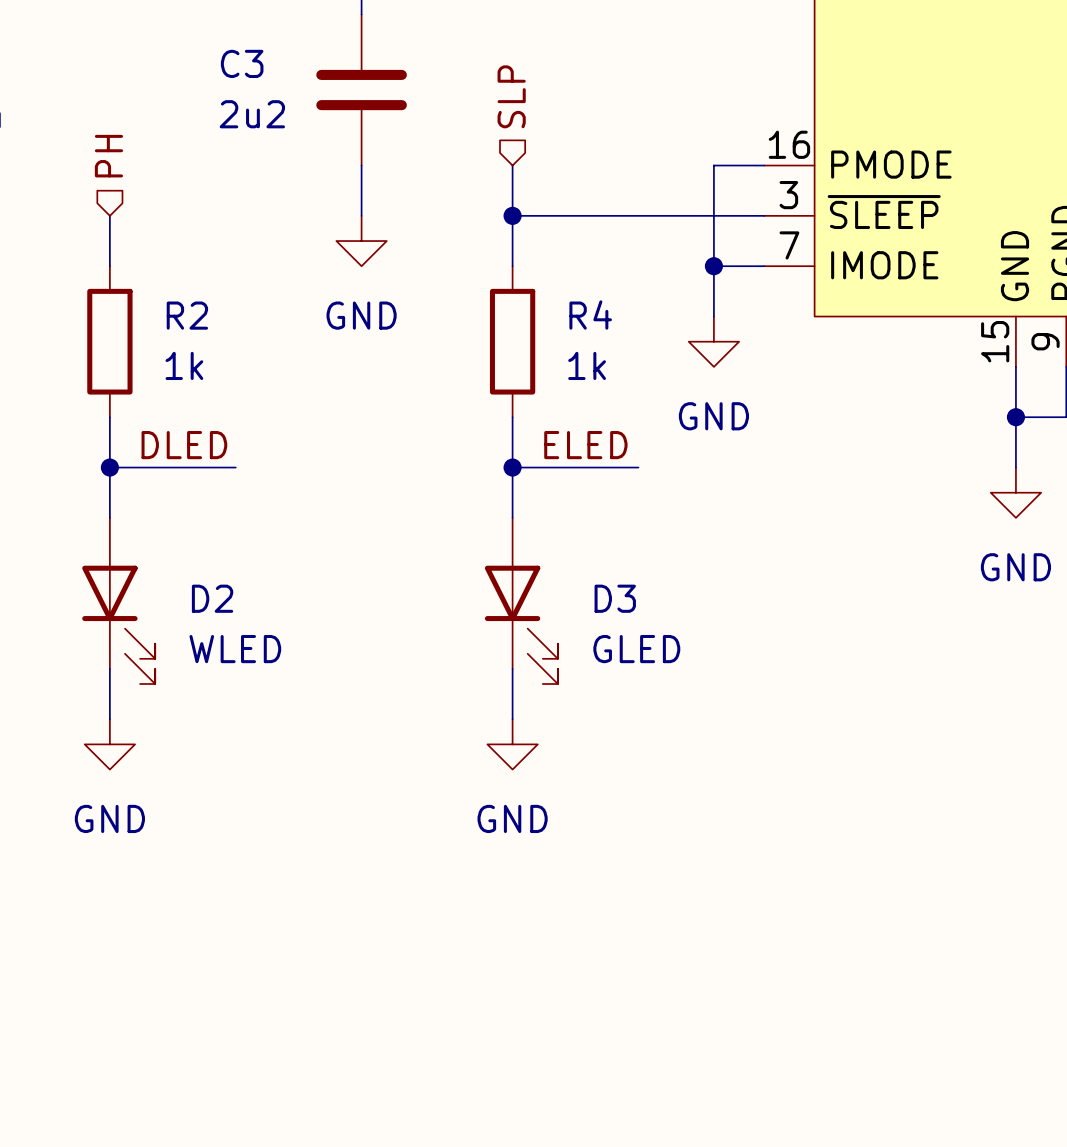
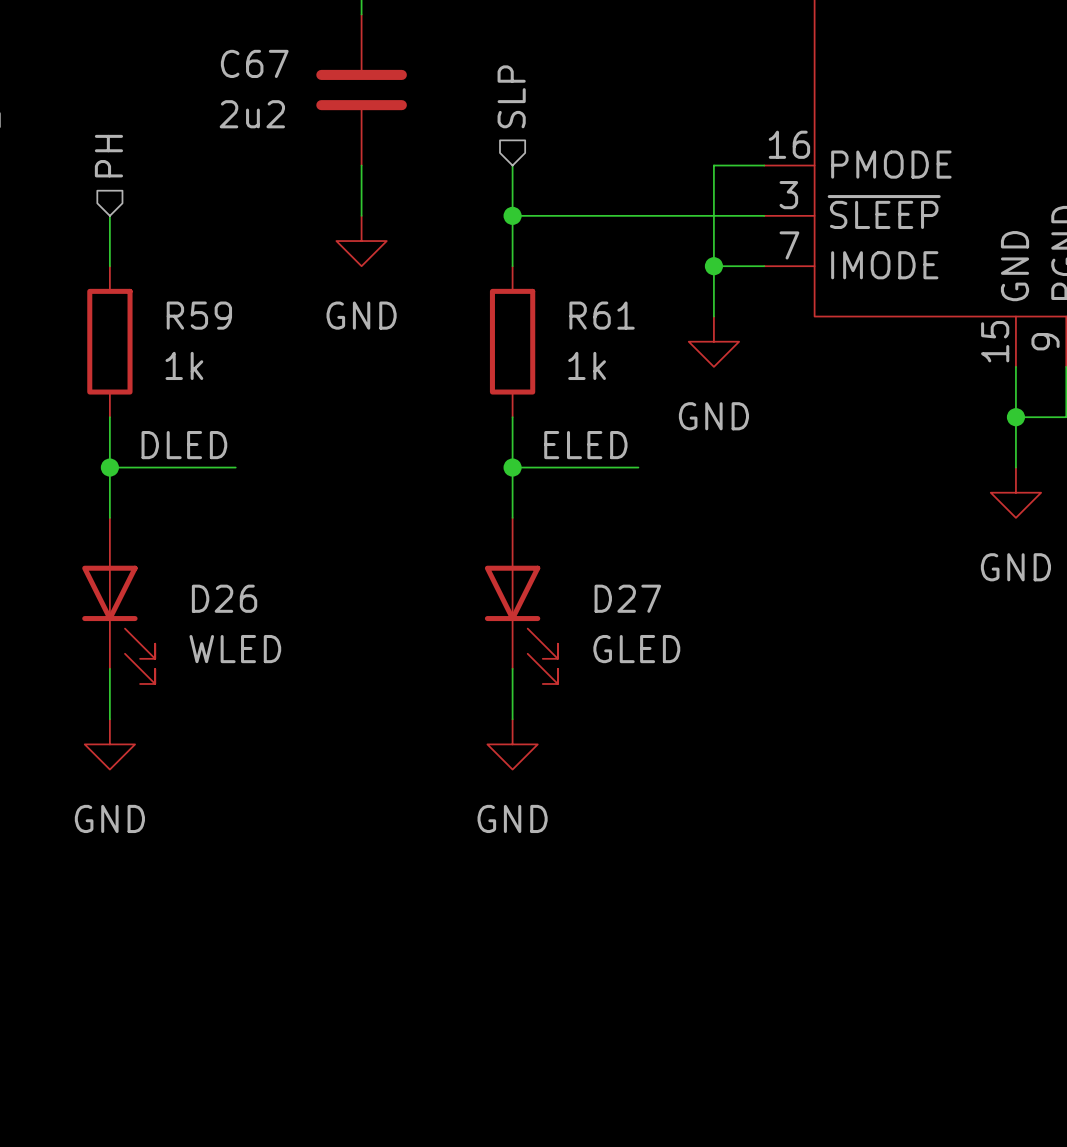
C3 name: C3 (242, 63) -> C67 (254, 63)
R4 name: R4 (590, 314) -> R61 (602, 315)
R2 name: R2 (187, 315) -> R59 (199, 315)
D2 name: D2 (212, 598) -> D26 (224, 598)
D3 name: D3 (615, 598) -> D27 (627, 598)

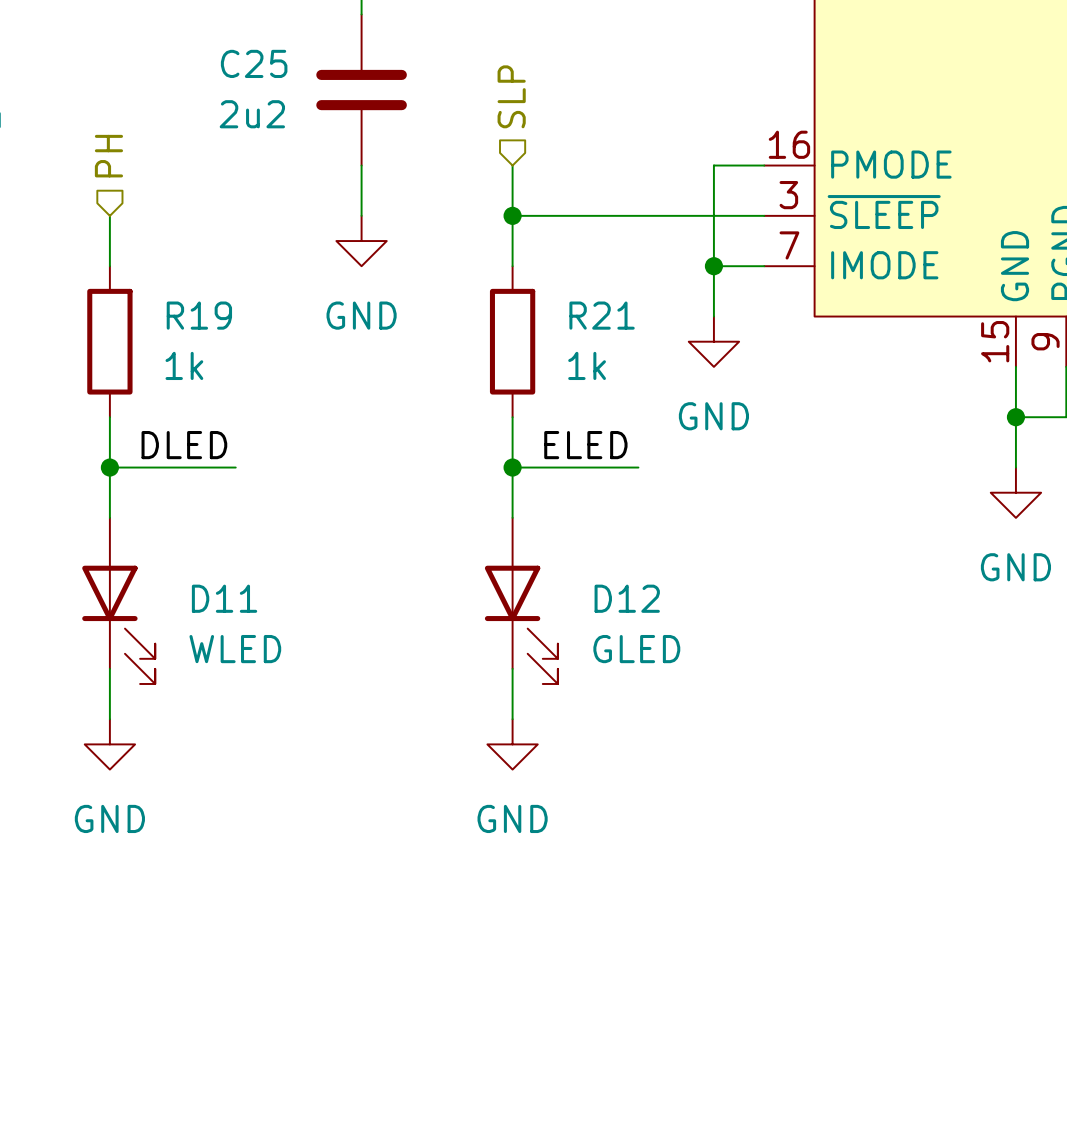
C67 name: C67 (254, 63) -> C25 (254, 63)
R59 name: R59 (199, 315) -> R19 (199, 315)
R61 name: R61 (602, 315) -> R21 (602, 315)
D26 name: D26 (224, 598) -> D11 (224, 598)
D27 name: D27 (627, 598) -> D12 (627, 598)

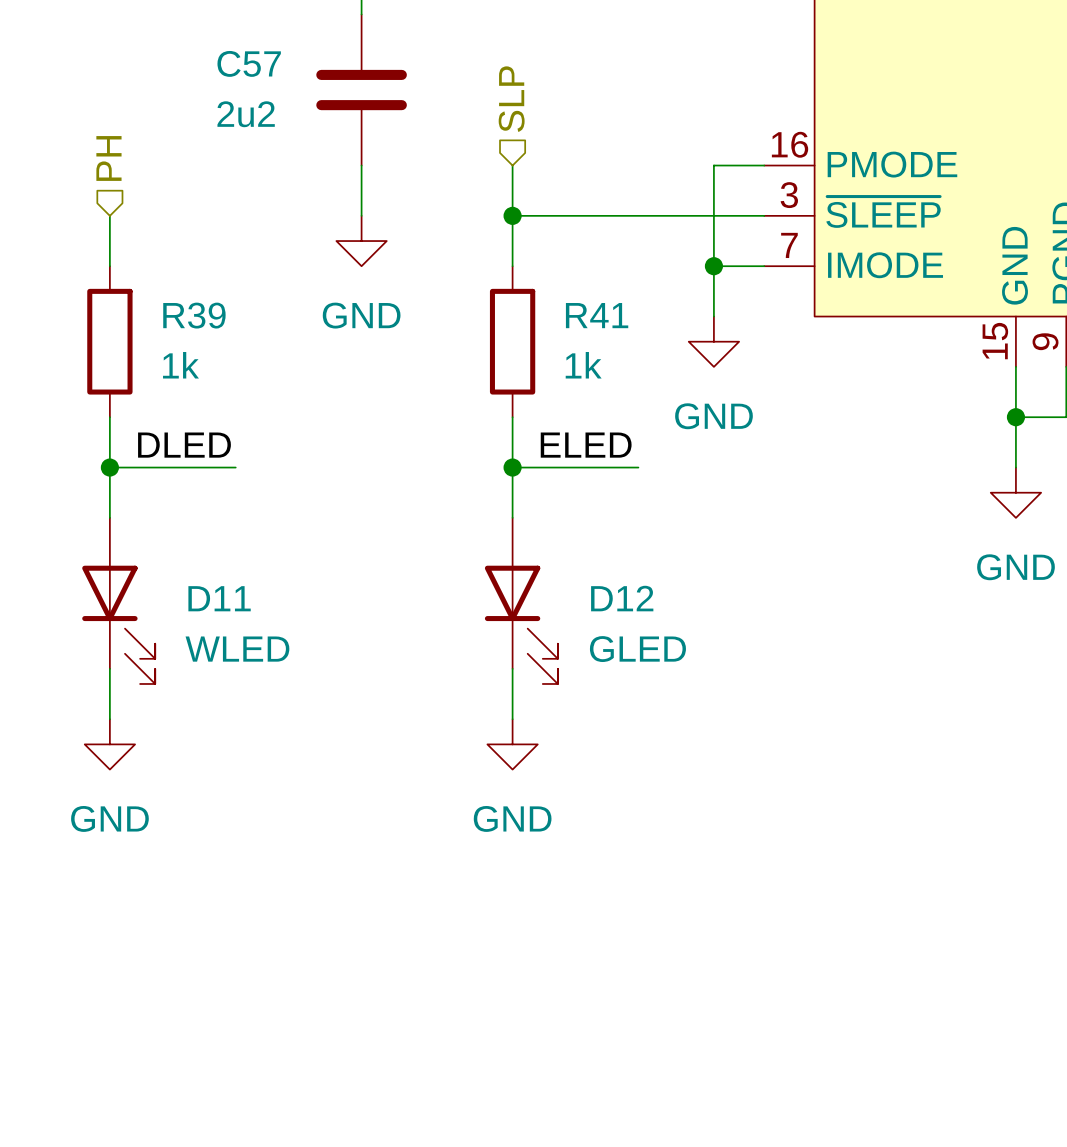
C25 name: C25 (254, 63) -> C57 (249, 63)
R19 name: R19 (199, 315) -> R39 (194, 315)
R21 name: R21 (602, 315) -> R41 (597, 315)

